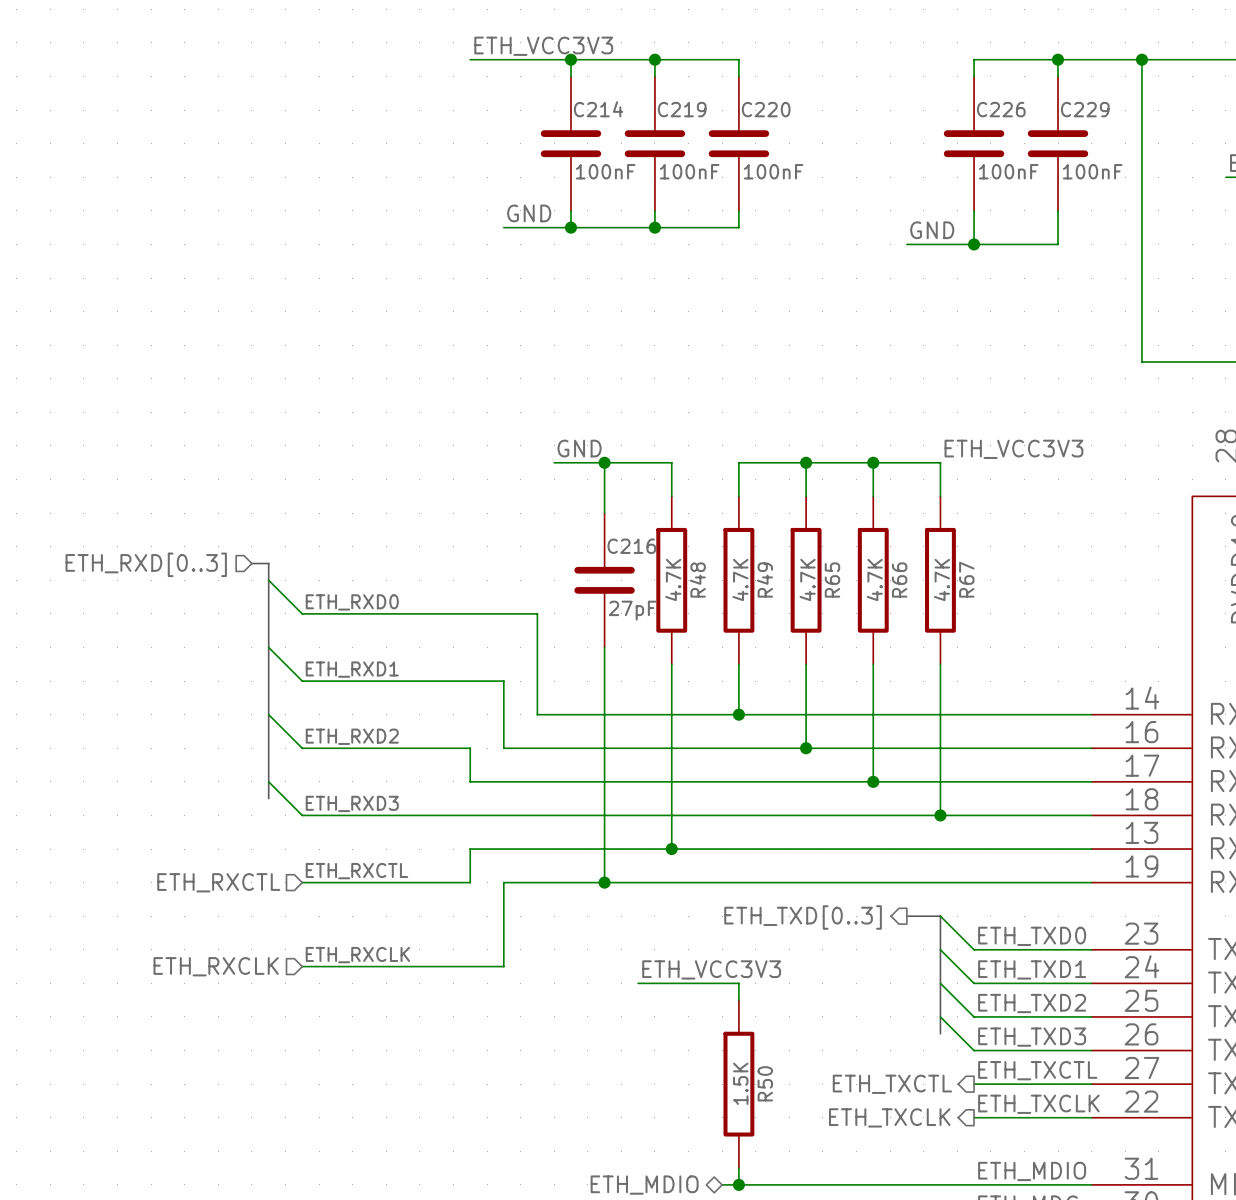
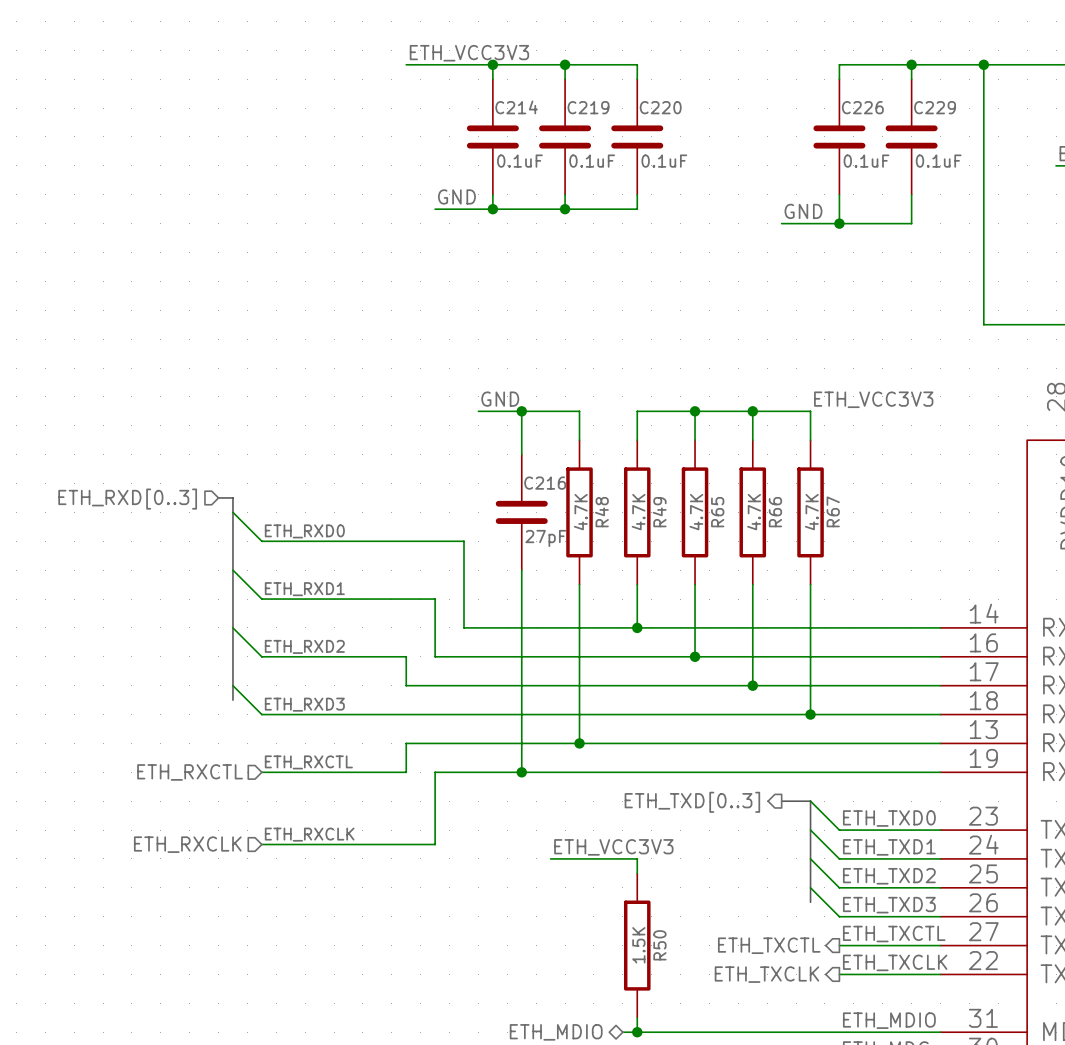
C214 value: 100nF (605, 171) -> 0.1uF (519, 161)
C219 value: 100nF (689, 171) -> 0.1uF (592, 161)
C220 value: 100nF (773, 171) -> 0.1uF (664, 161)
C226 value: 100nF (1008, 171) -> 0.1uF (866, 161)
C229 value: 100nF (1092, 171) -> 0.1uF (938, 161)

